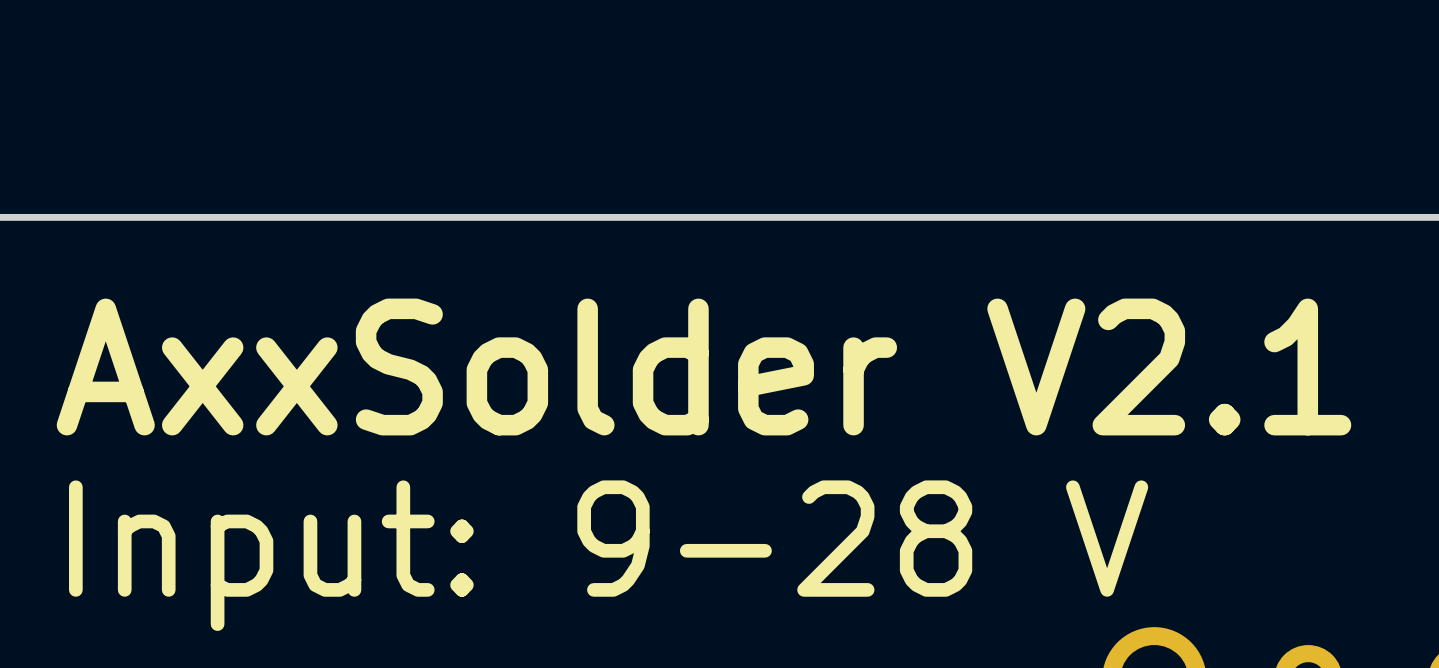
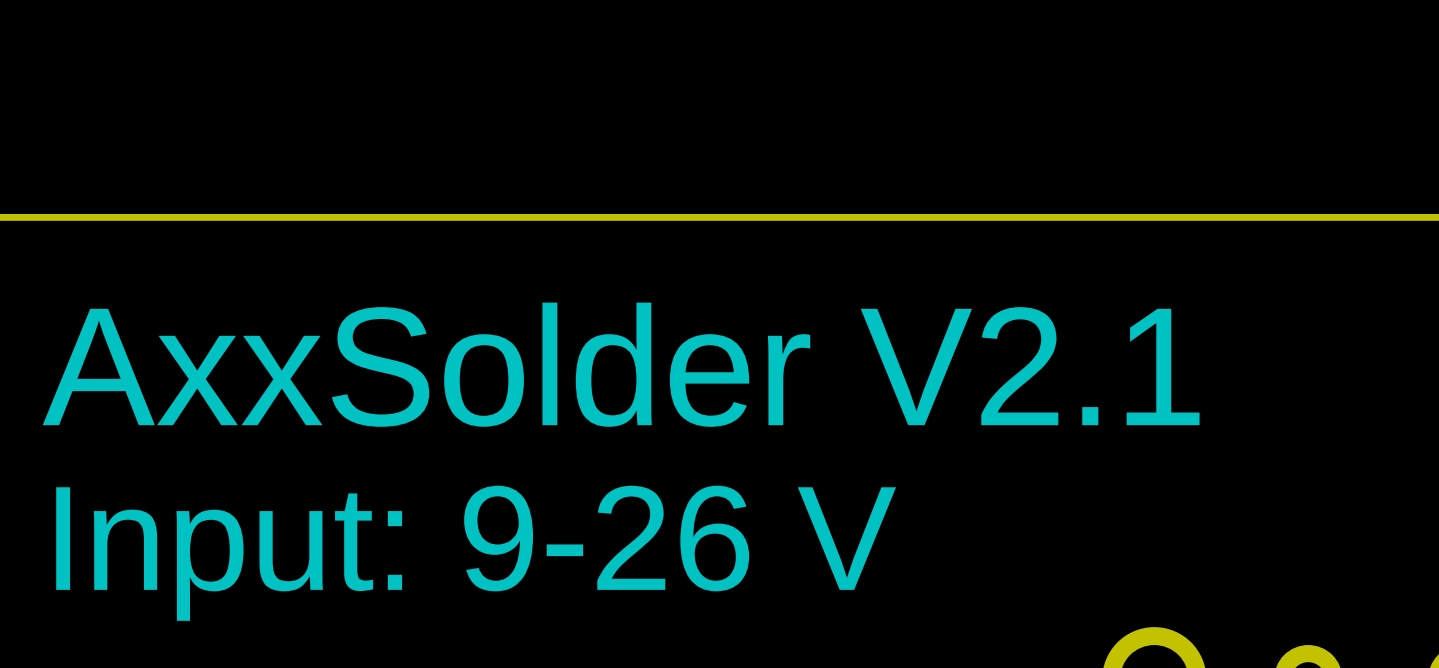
text: Input: 9-28 V (608, 555) -> Input: 9-26 V (476, 553)

